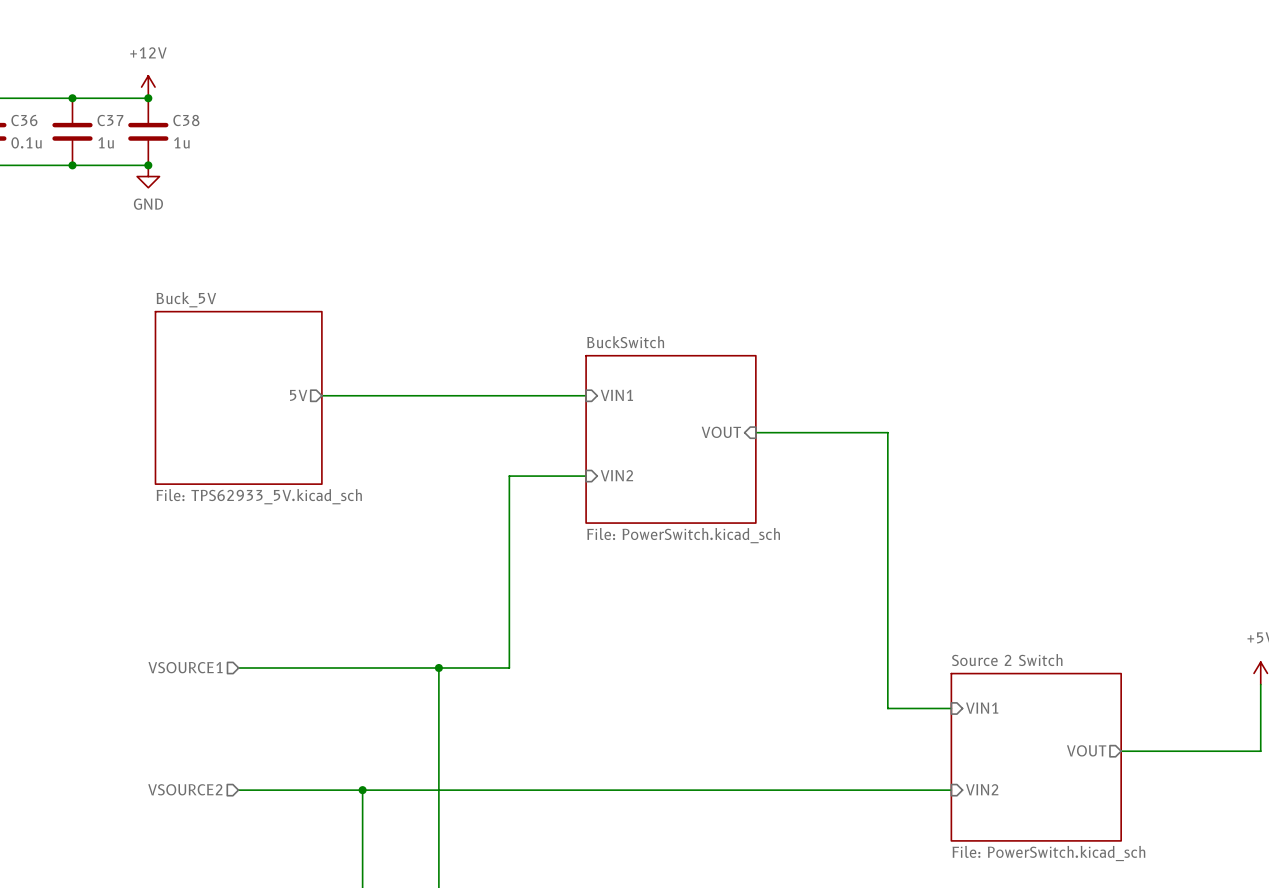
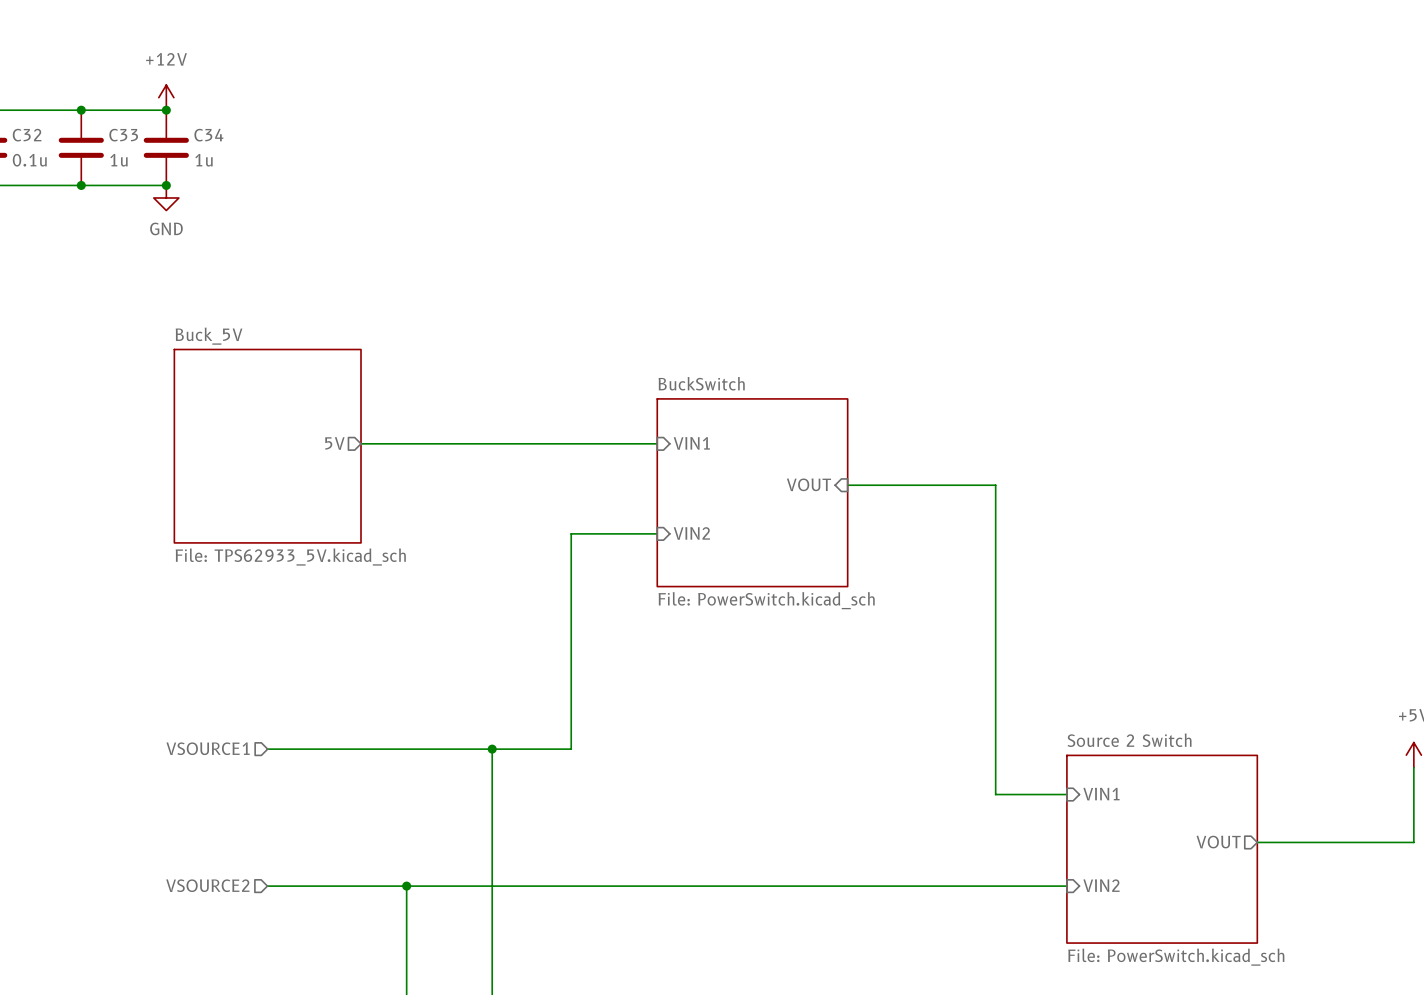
C36 name: C36 (24, 120) -> C32 (27, 135)
C37 name: C37 (110, 120) -> C33 (123, 135)
C38 name: C38 (186, 120) -> C34 (208, 135)

